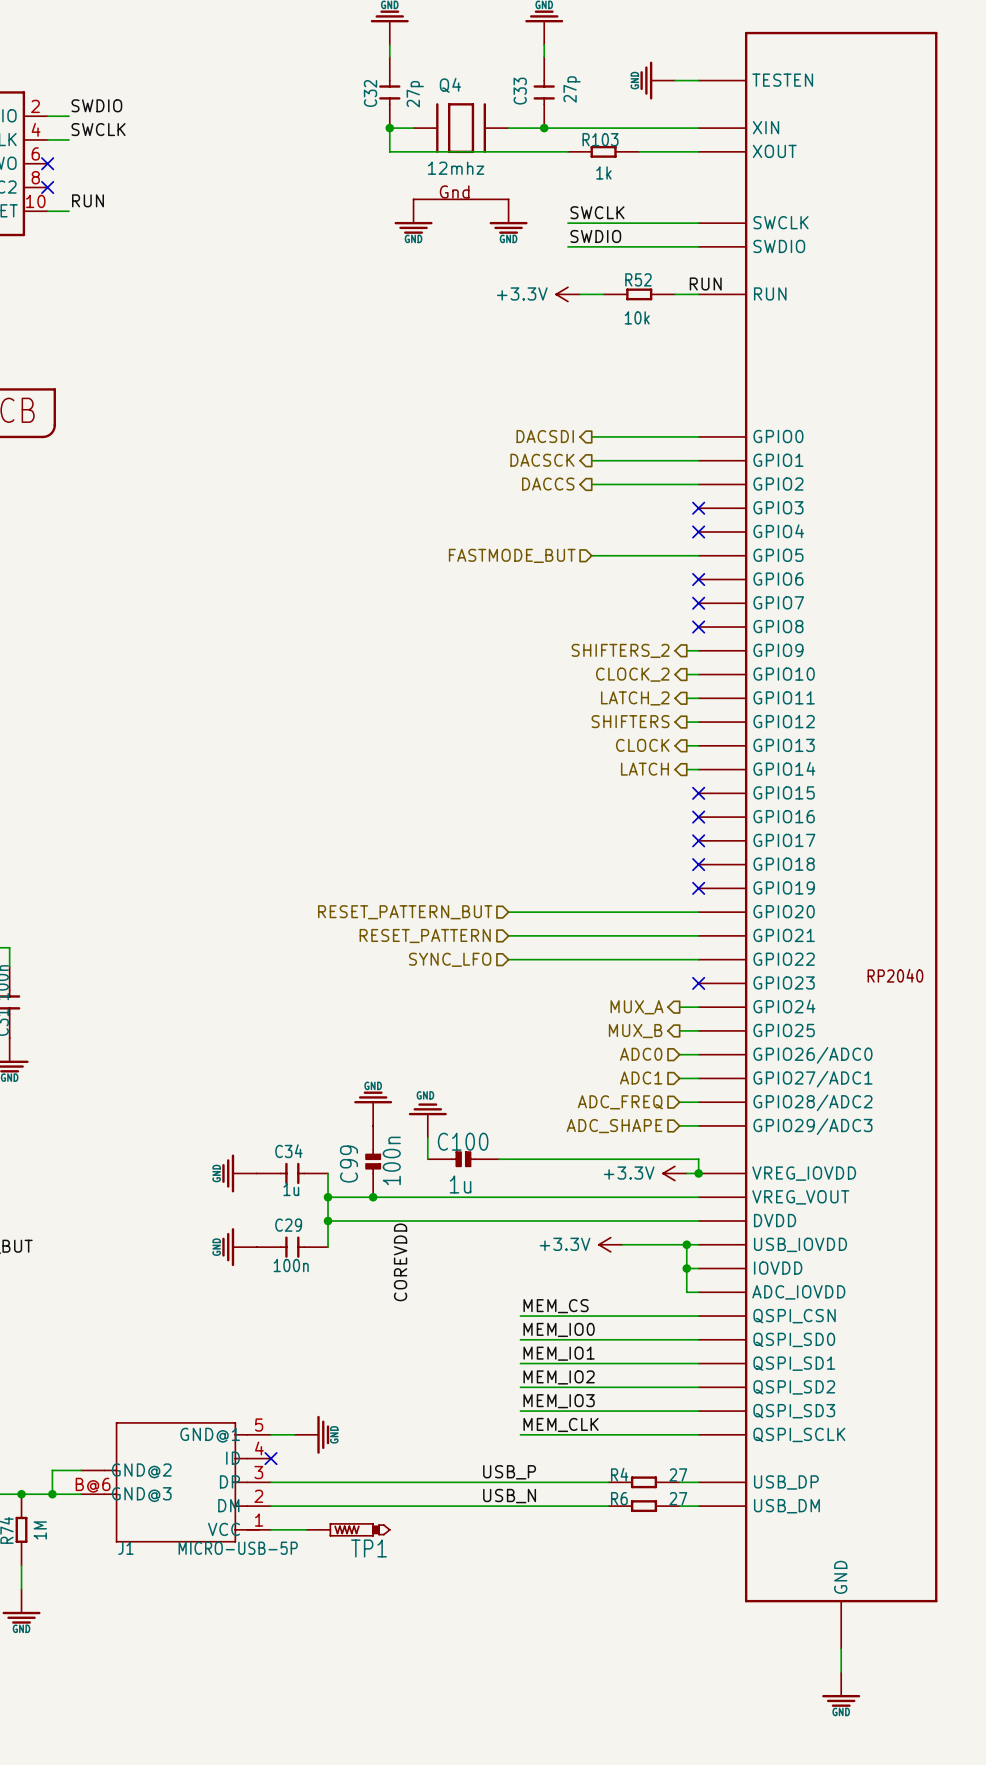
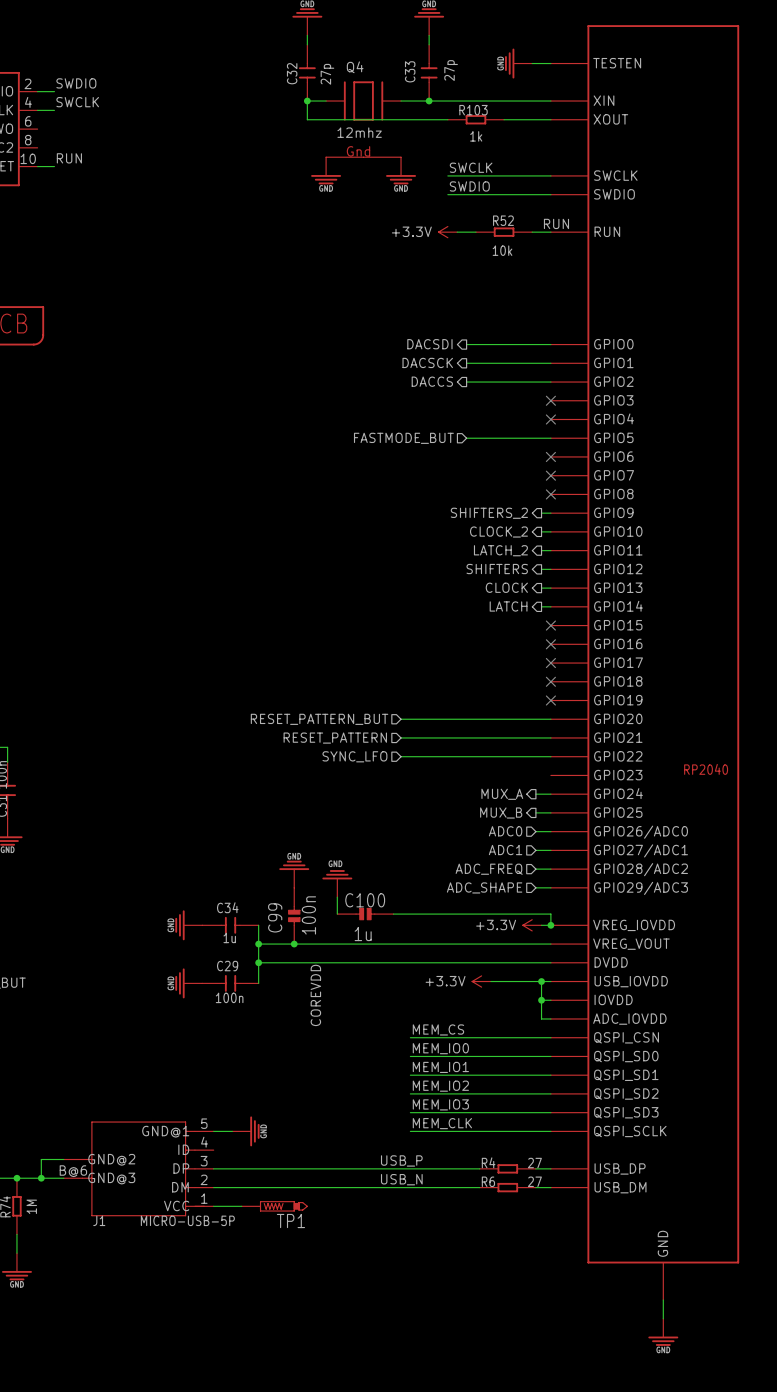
no-connect mark: (47, 163) -> none
no-connect mark: (47, 187) -> none
no-connect mark: (698, 983) -> none
no-connect mark: (270, 1458) -> none

